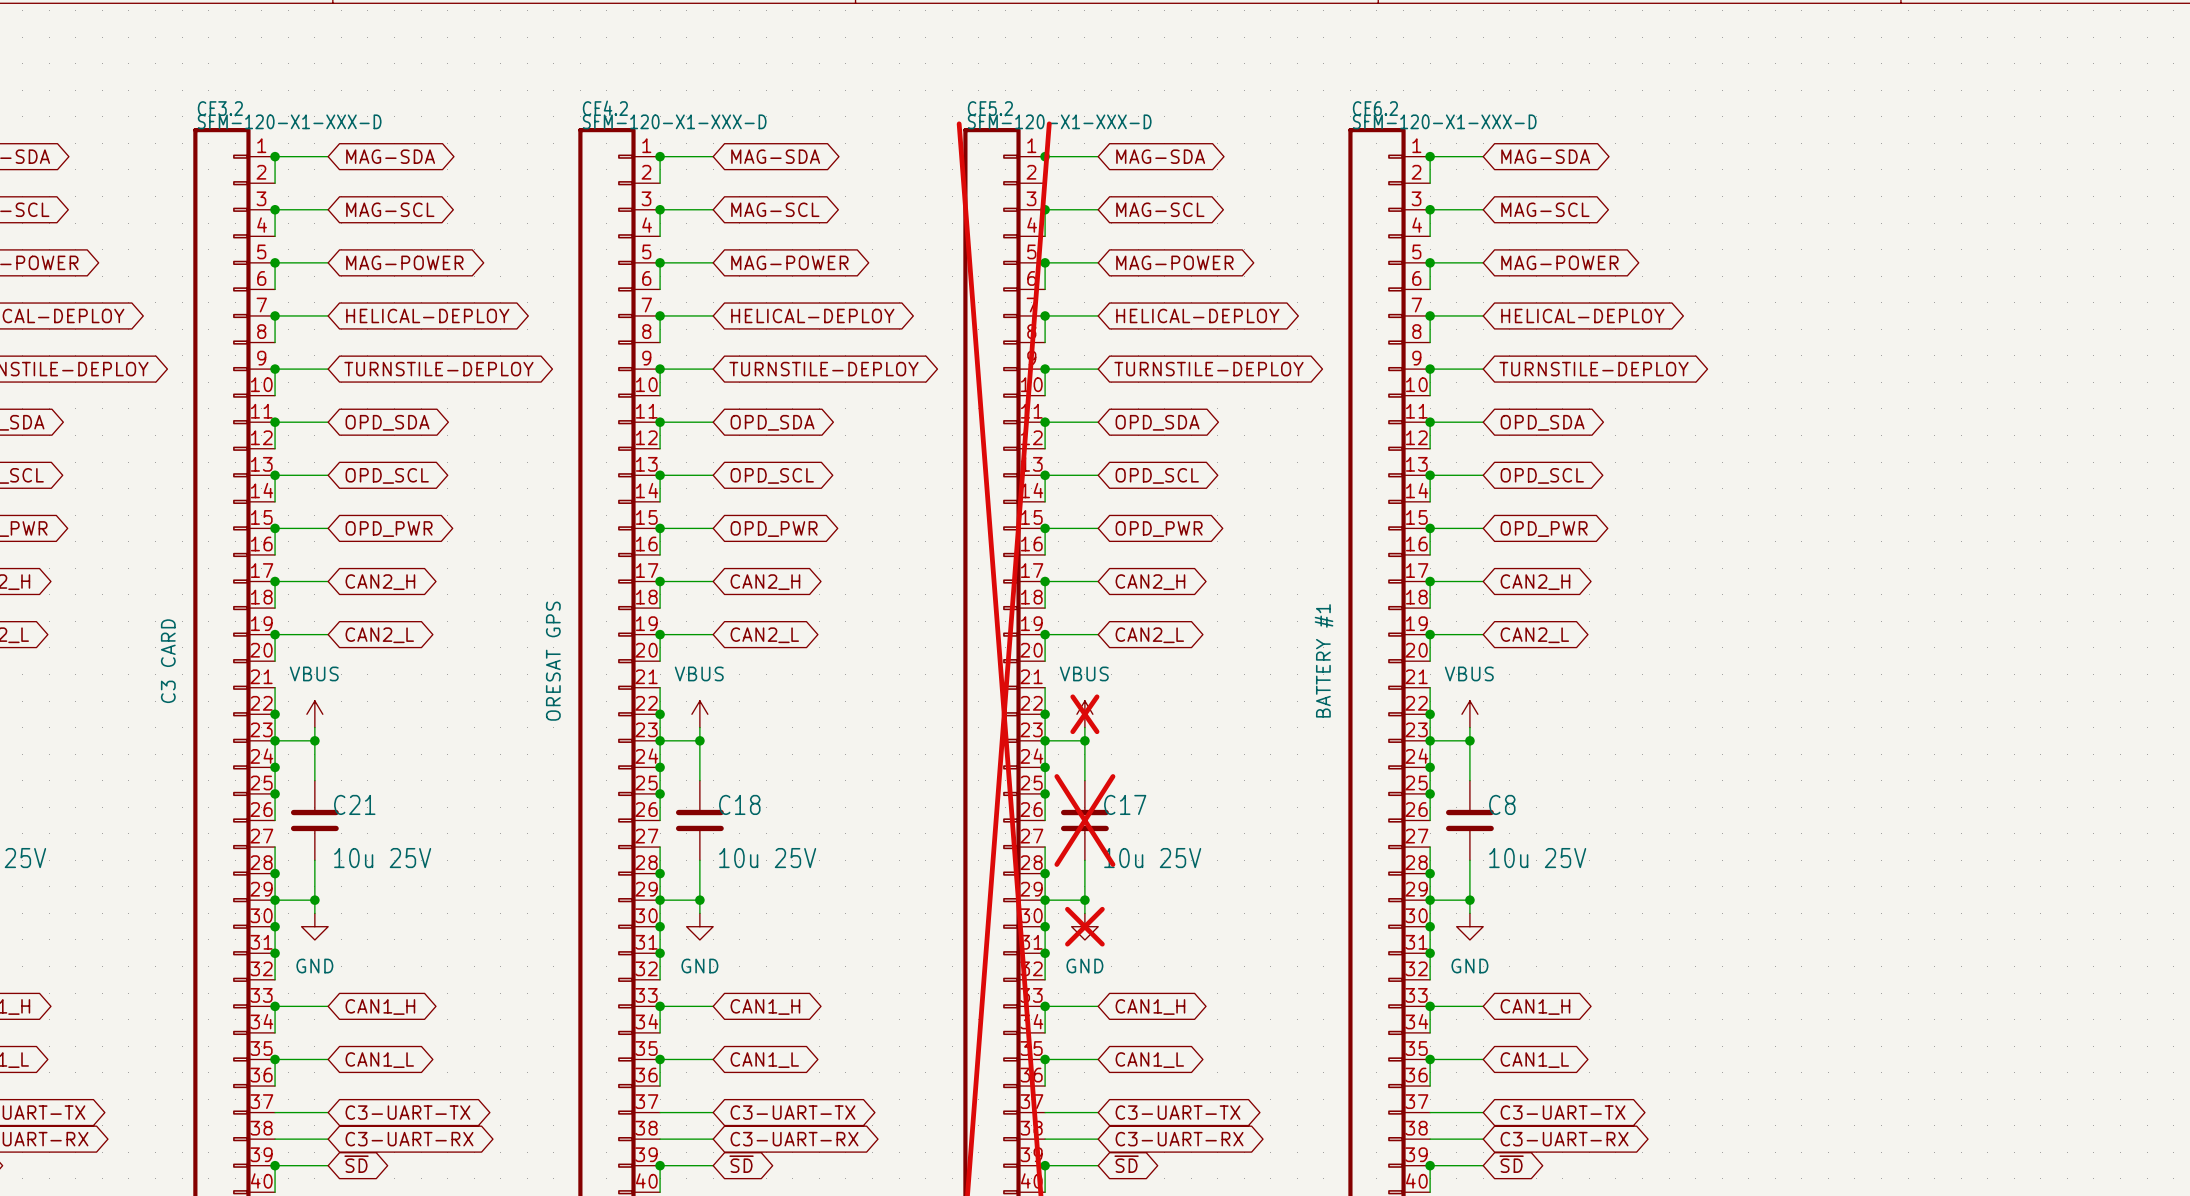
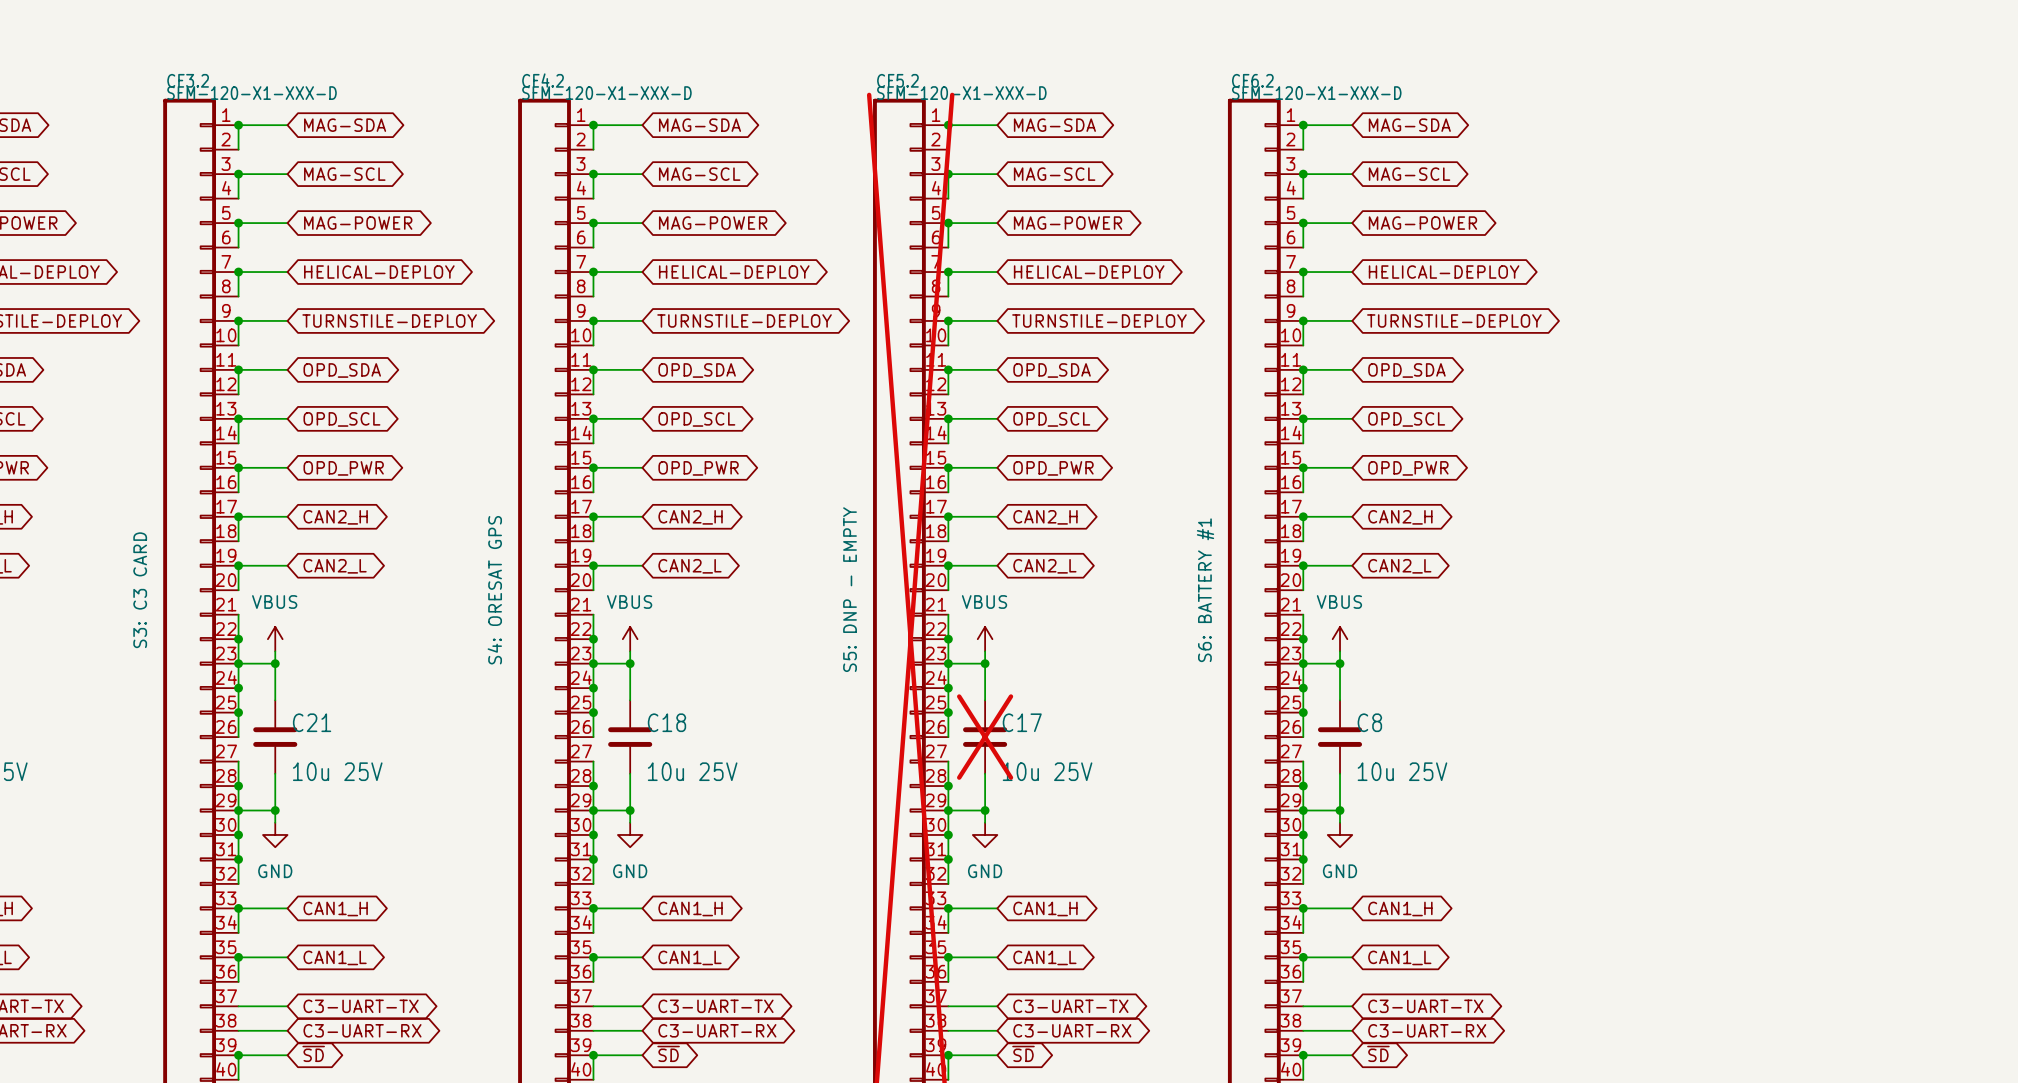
CF5.2 text: none -> S5: DNP - EMPTY (850, 589)
CF6.2 text: BATTERY #1 (1324, 660) -> S6: BATTERY #1 (1205, 590)
CF3.2 text: C3 CARD (168, 661) -> S3: C3 CARD (140, 590)
CF4.2 text: ORESAT GPS (553, 661) -> S4: ORESAT GPS (494, 590)
power symbol do-not-place cross: (1084, 714) -> none
power symbol do-not-place cross: (1084, 926) -> none

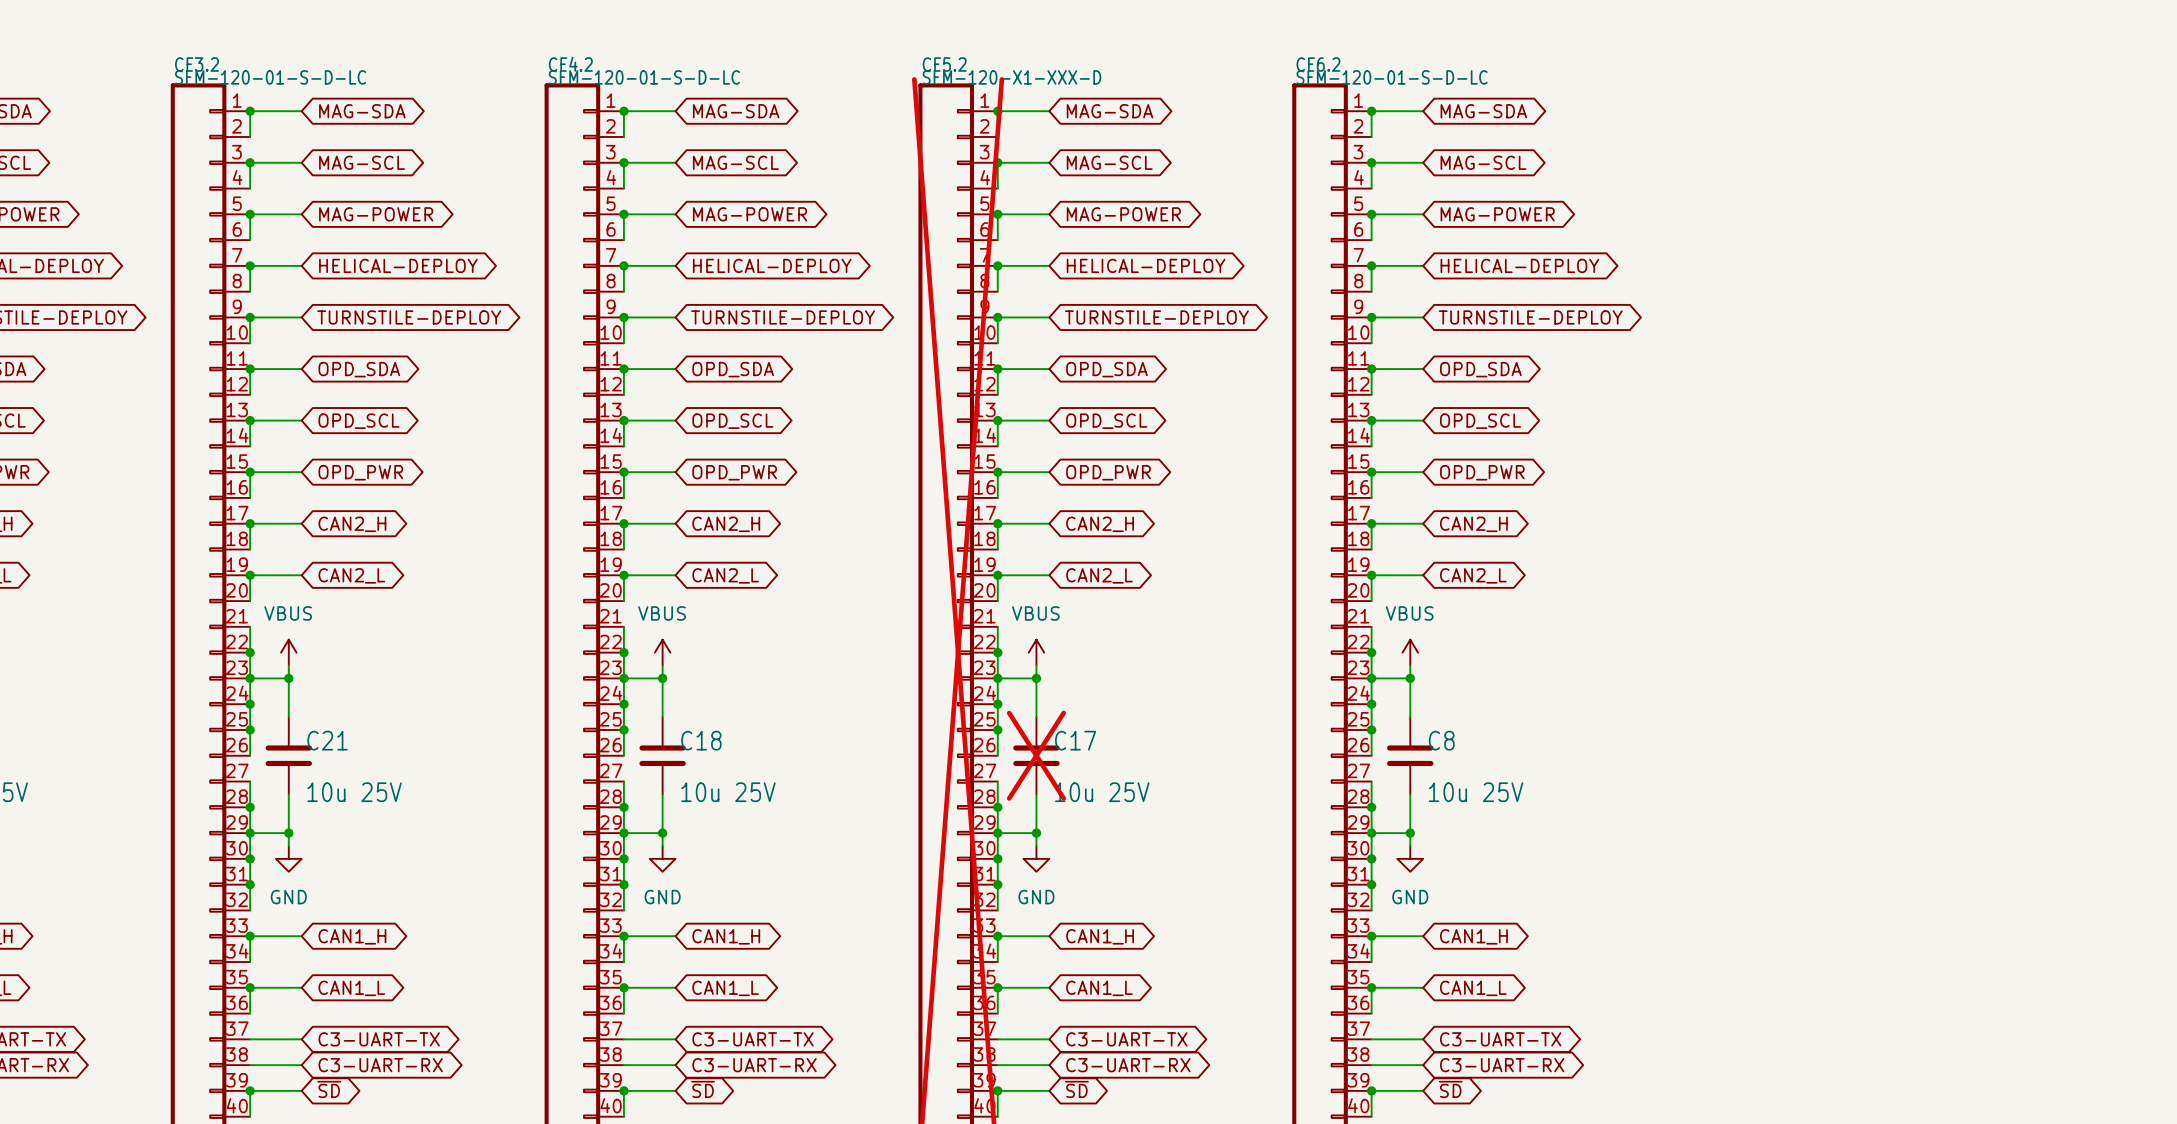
CF3.2 value: SFM-120-X1-XXX-D (252, 93) -> SFM-120-01-S-D-LC (270, 77)
CF4.2 value: SFM-120-X1-XXX-D (606, 93) -> SFM-120-01-S-D-LC (644, 77)
CF6.2 value: SFM-120-X1-XXX-D (1316, 93) -> SFM-120-01-S-D-LC (1392, 77)
CF5.2 text: S5: DNP - EMPTY (850, 589) -> none
CF3.2 text: S3: C3 CARD (140, 590) -> none
CF4.2 text: S4: ORESAT GPS (494, 590) -> none
CF6.2 text: S6: BATTERY #1 (1205, 590) -> none

